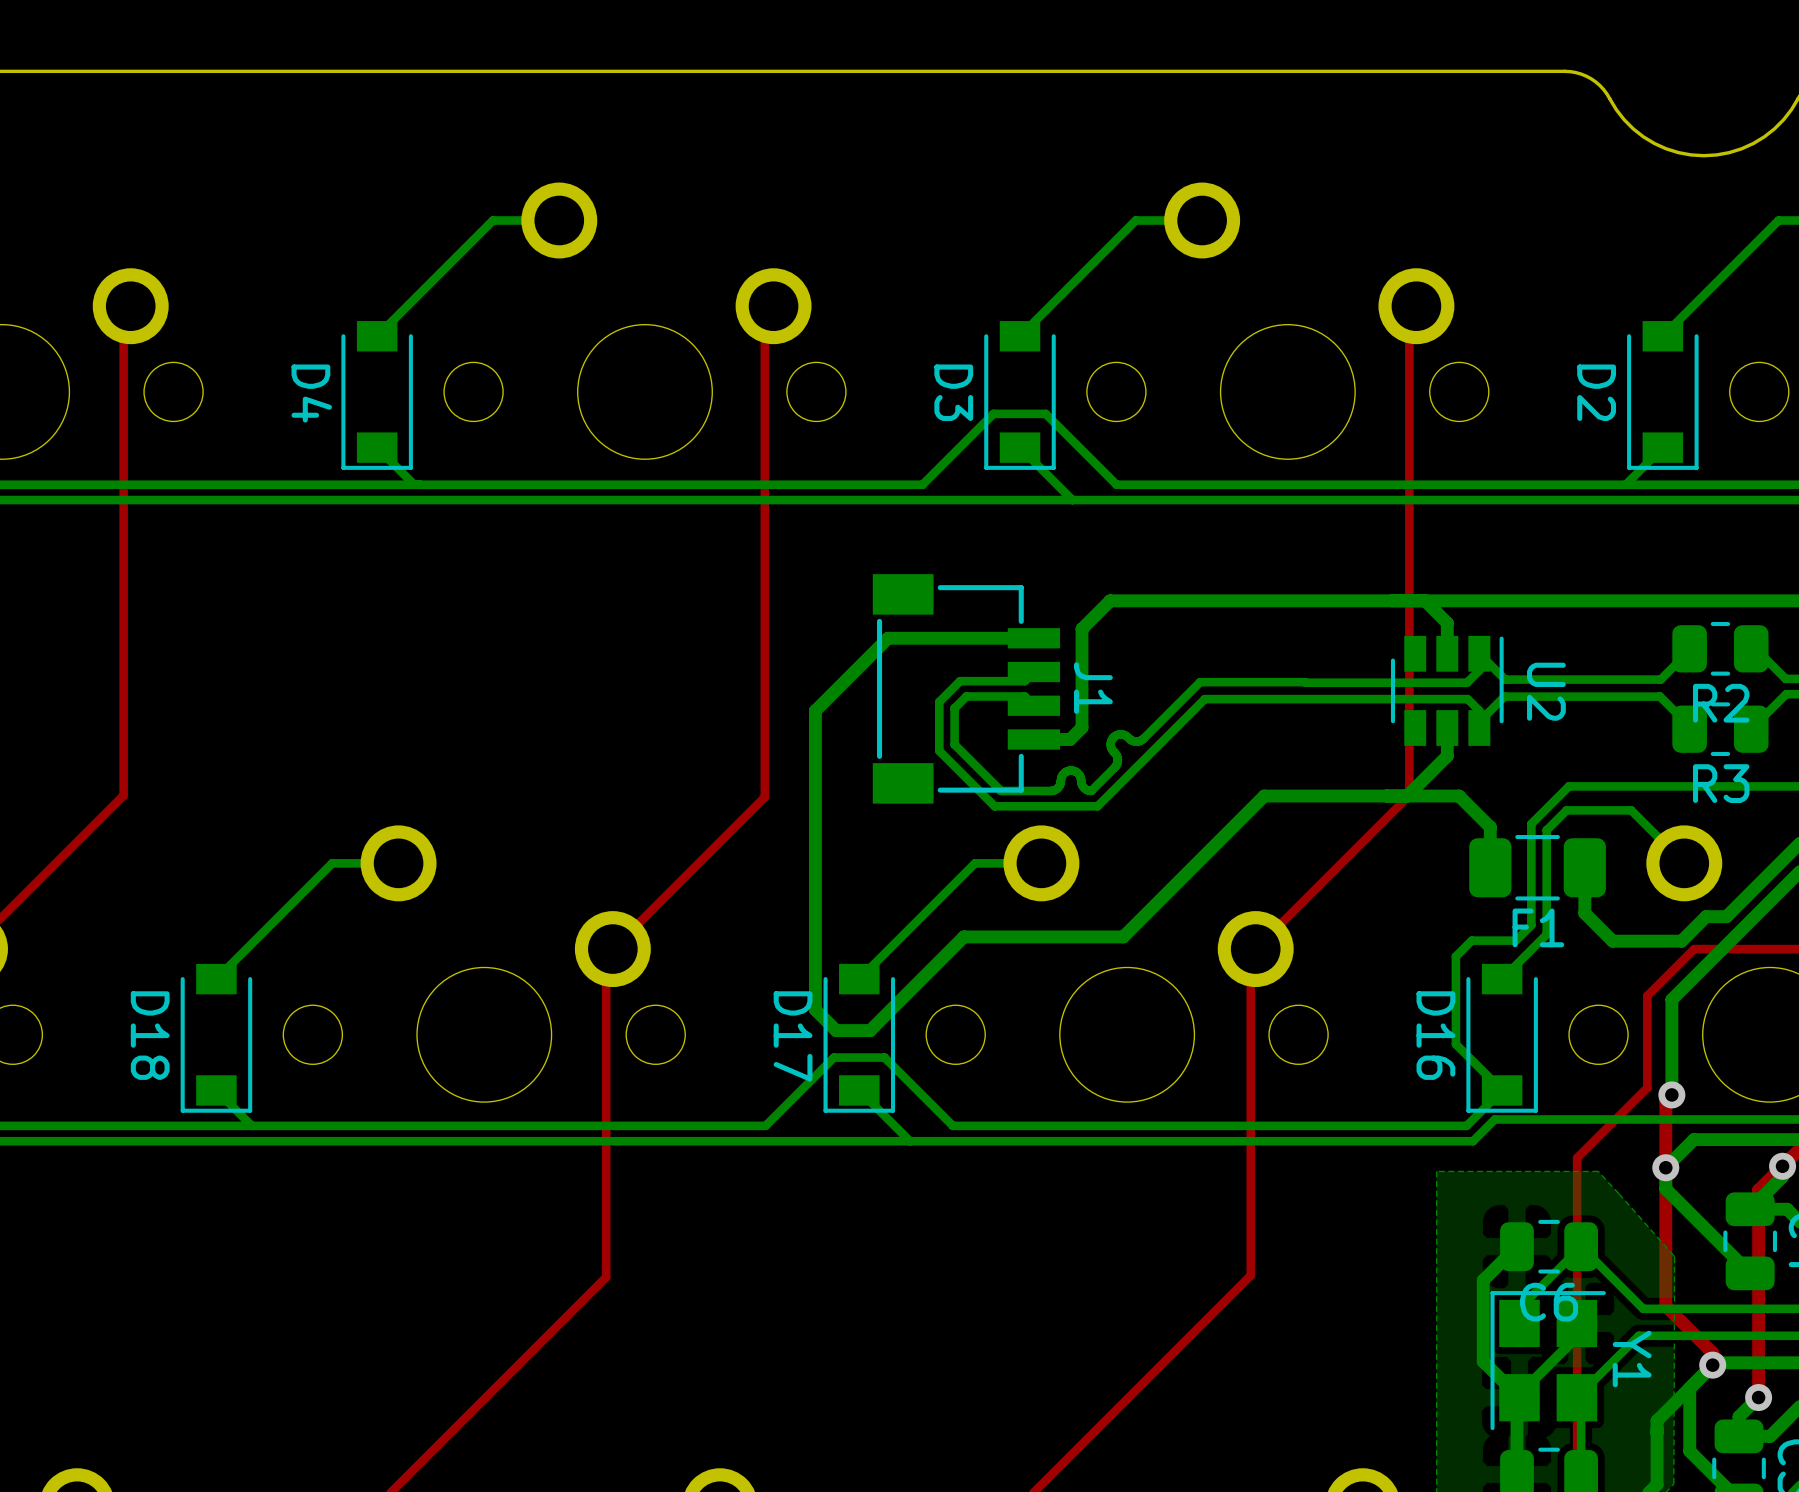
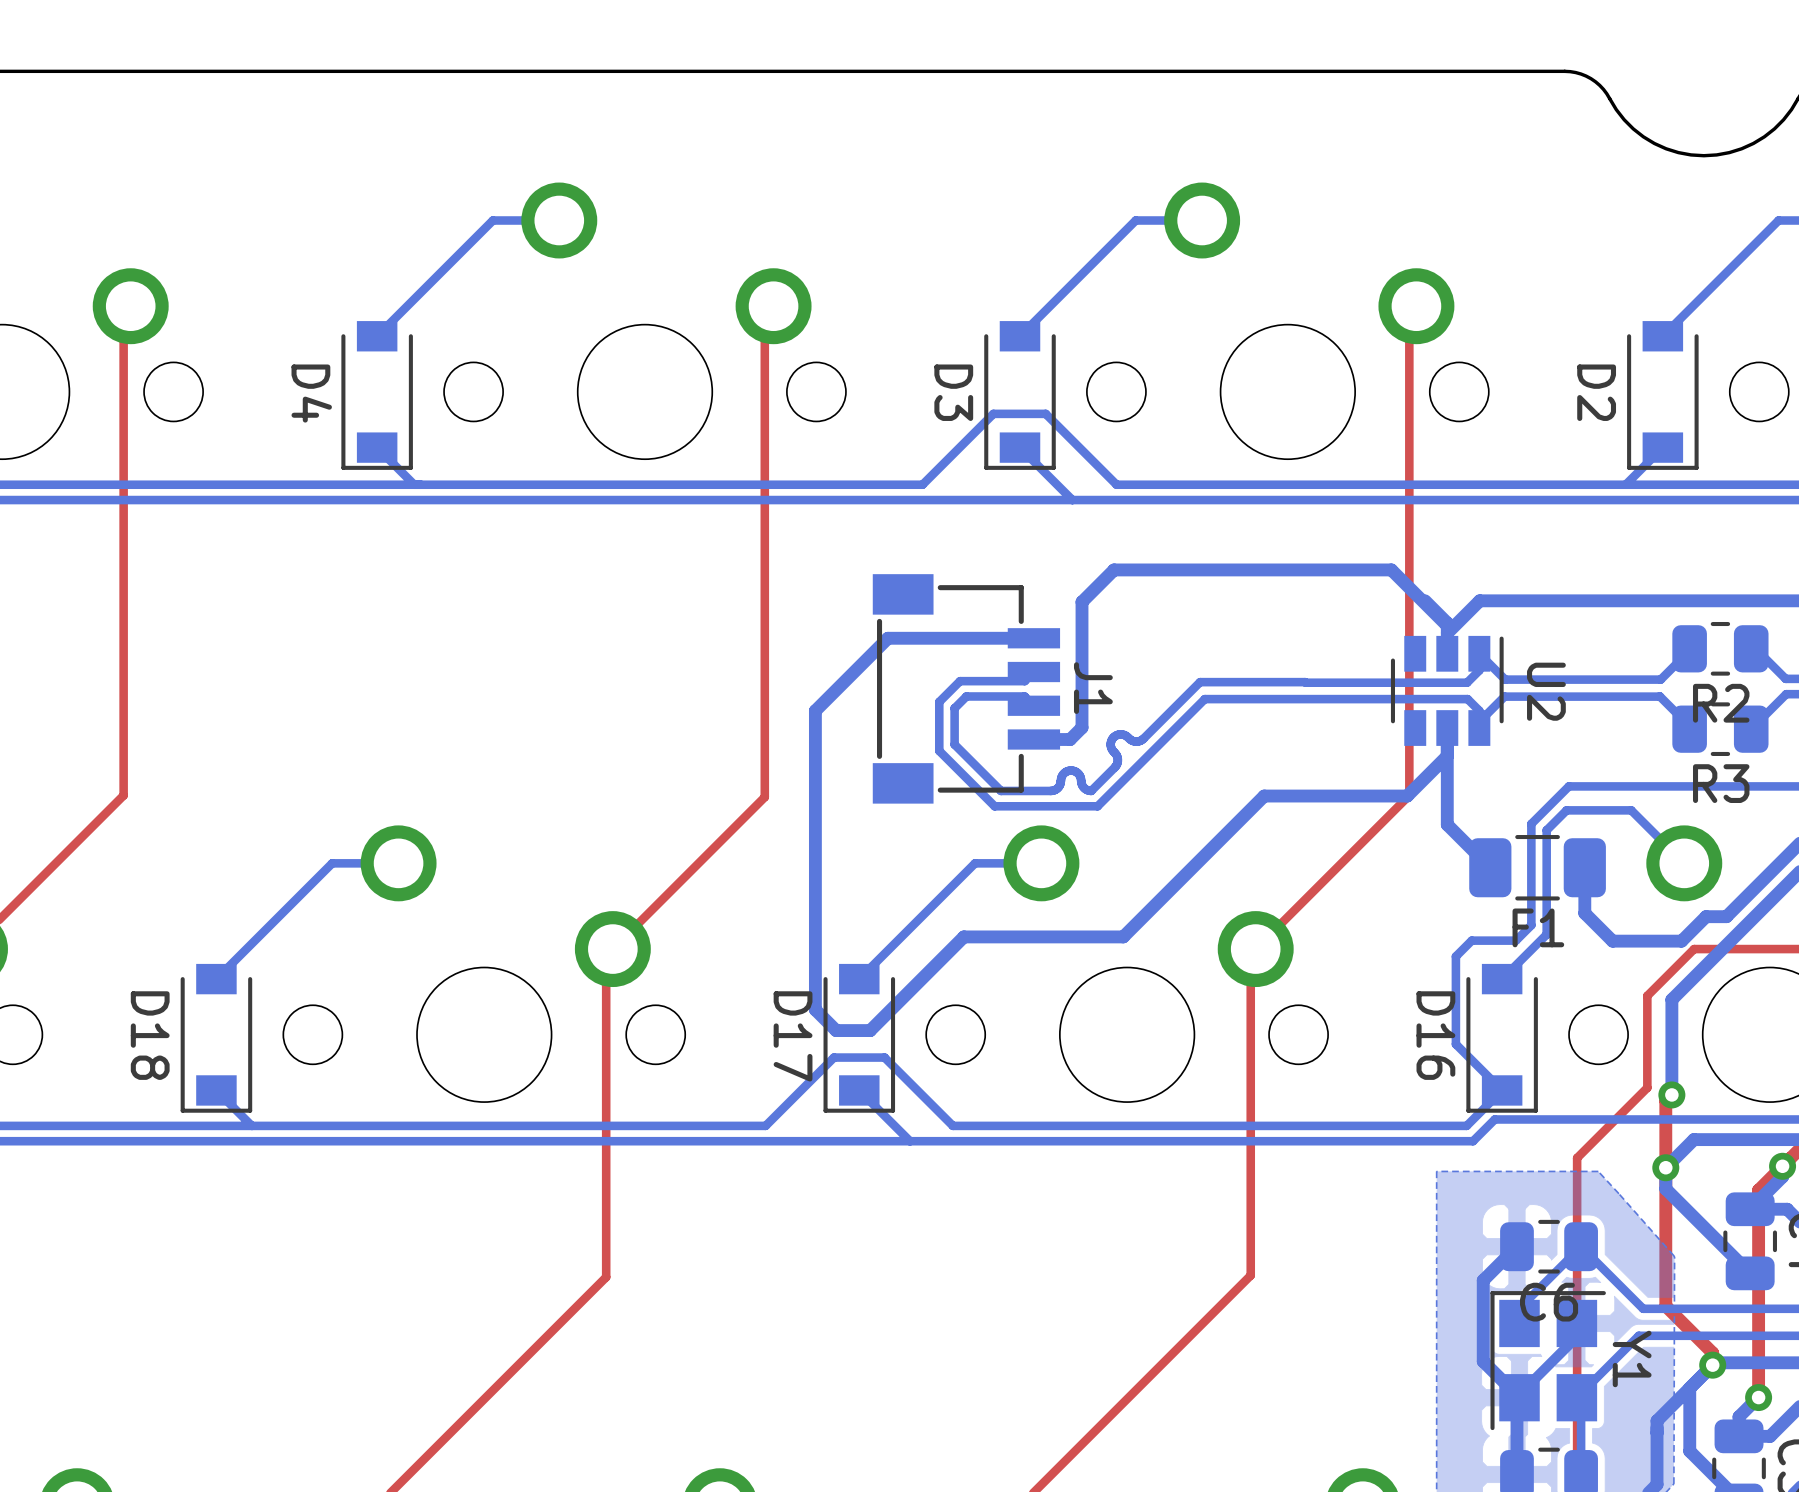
bottom track: (1479, 600) (1110, 600) (1082, 628) -> (1447, 625) (1391, 569) (1114, 569) (1082, 601) (1082, 628)
bottom track: none -> (1479, 600) (1447, 633)
bottom track: (1407, 796) (1459, 796) (1490, 827) (1490, 867) -> (1447, 756) (1447, 824) (1490, 867)

